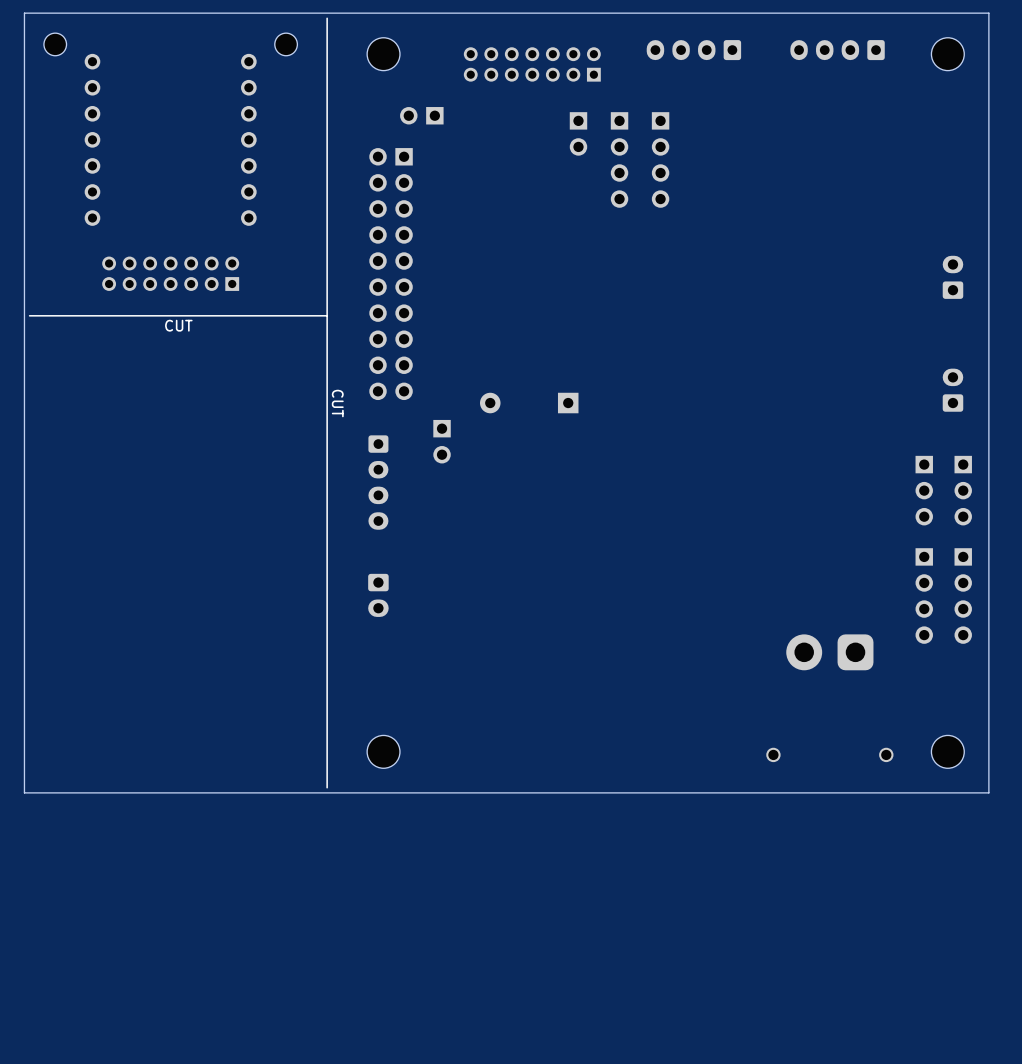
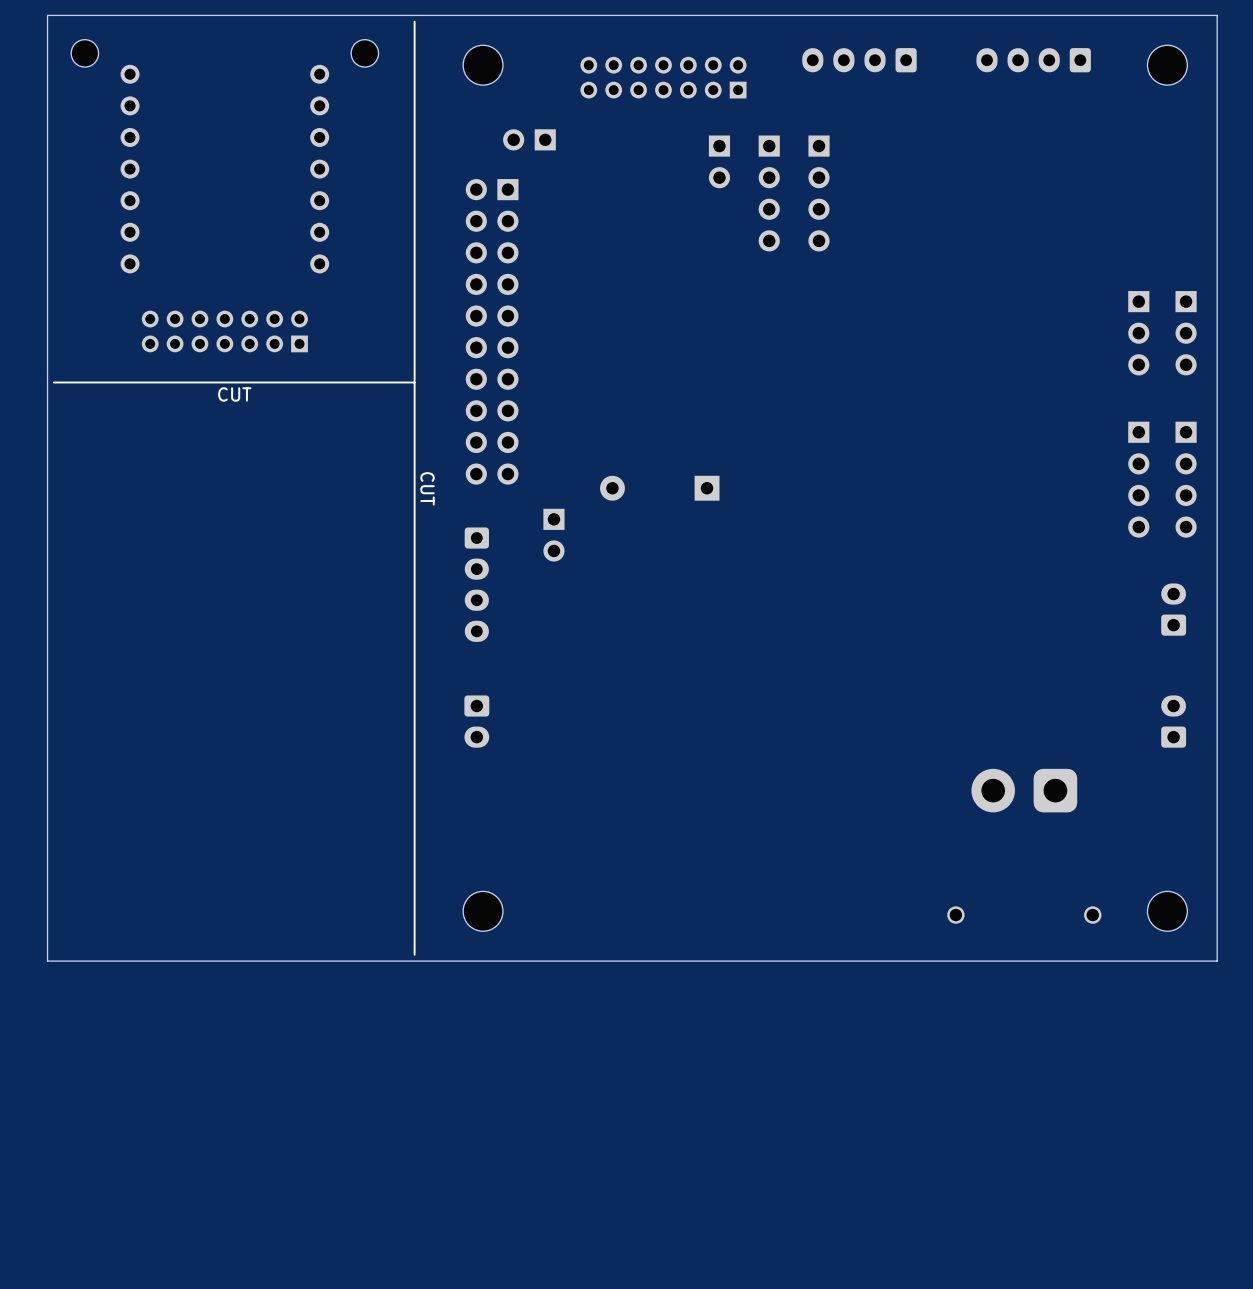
part: none -> (1138, 333)
part: none -> (1186, 333)
part: (952, 277) -> none
part: (952, 390) -> none
part: none -> (1138, 479)
part: none -> (1186, 479)
part: (924, 490) -> none
part: (963, 490) -> none
part: none -> (1173, 609)
part: none -> (1173, 721)
part: (924, 596) -> none
part: (963, 596) -> none

